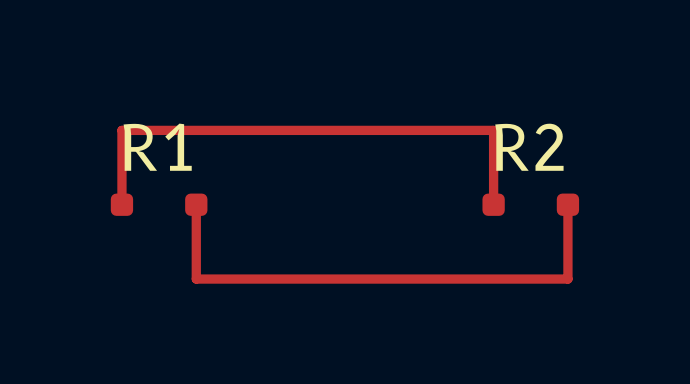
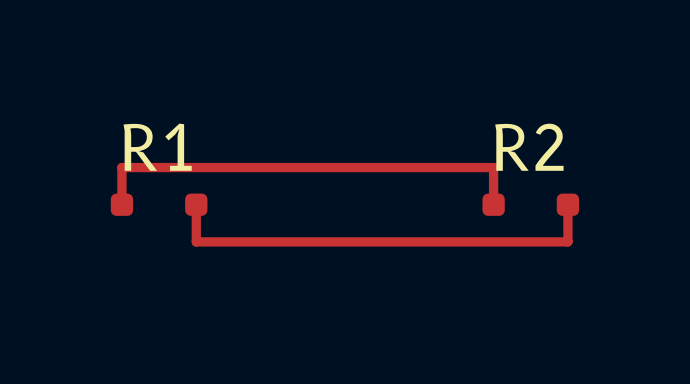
top track: (121, 167) (121, 130) (493, 130) (493, 167) -> (121, 167) (493, 167)
top track: (196, 241) (196, 279) (567, 279) (567, 241) -> (196, 241) (567, 241)

